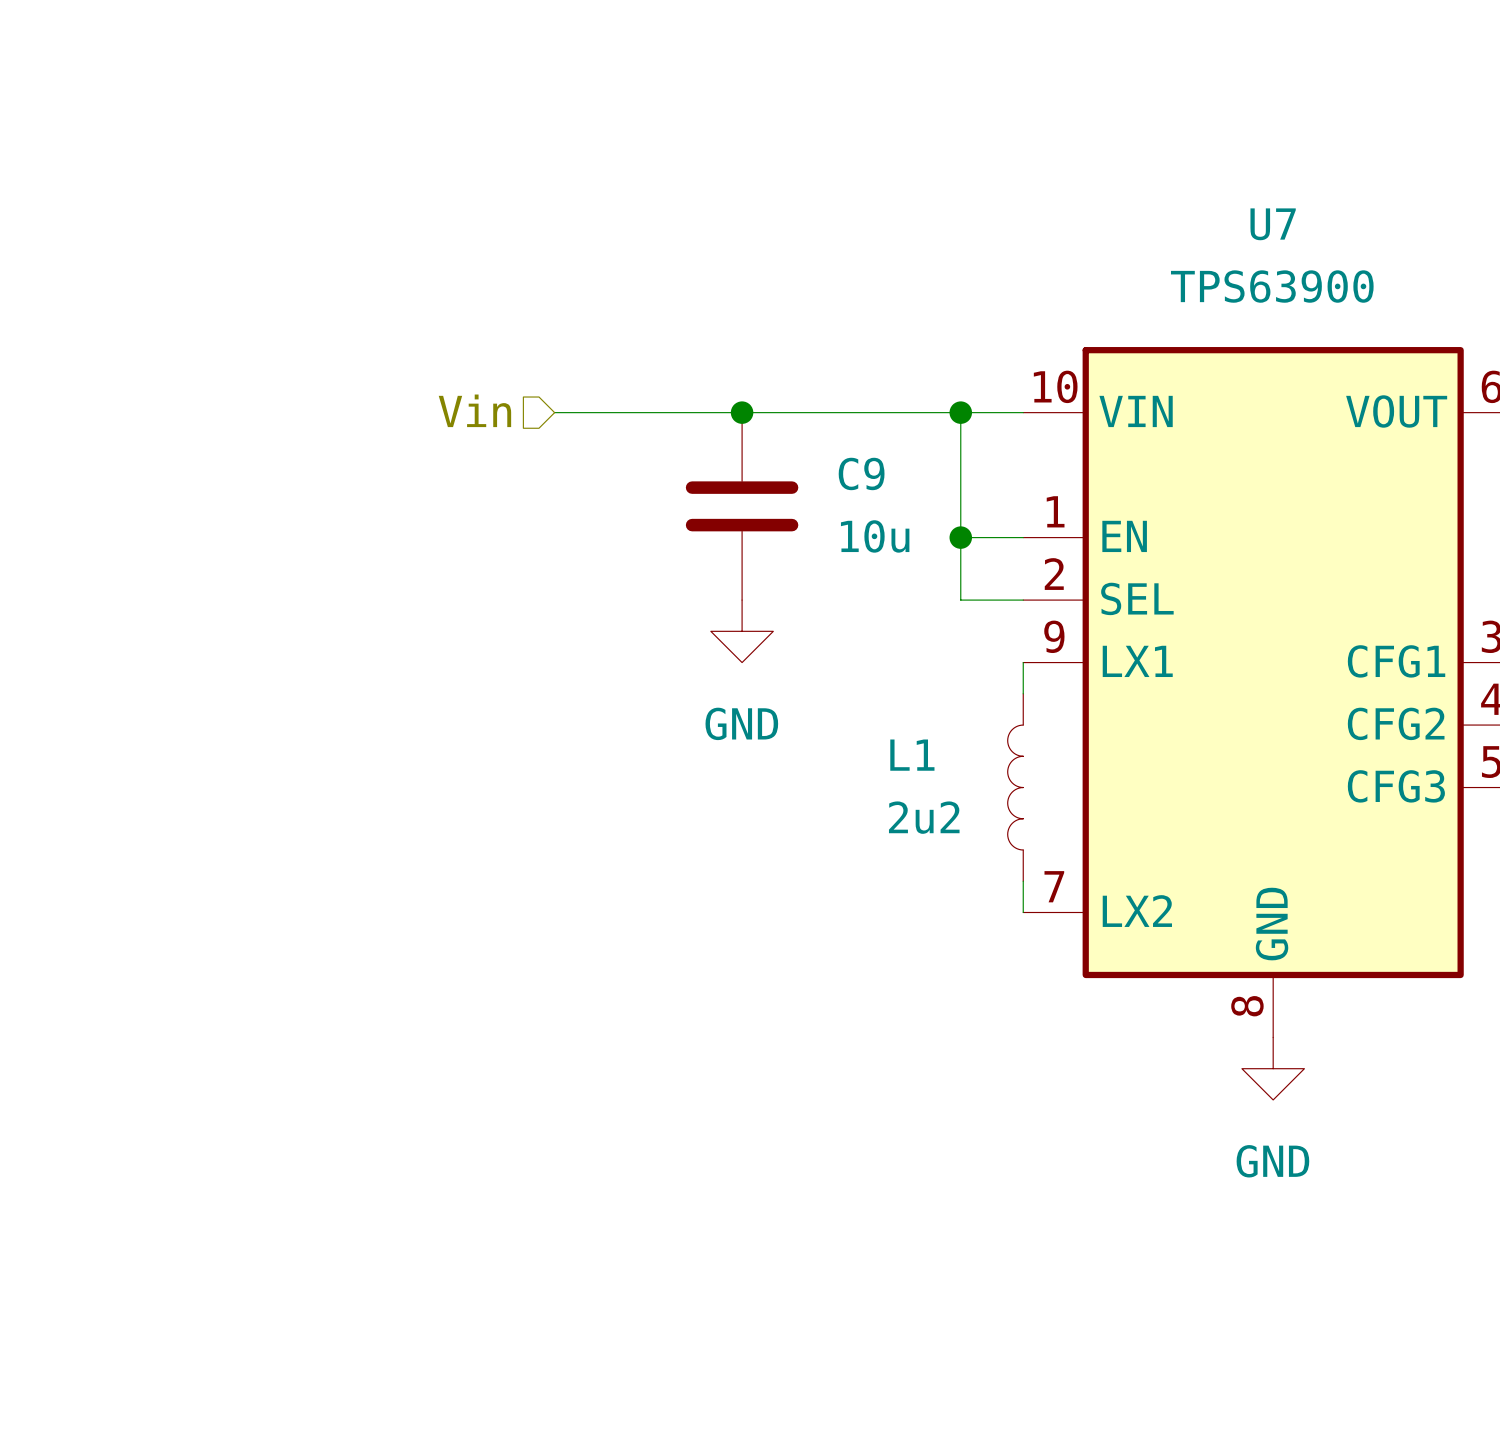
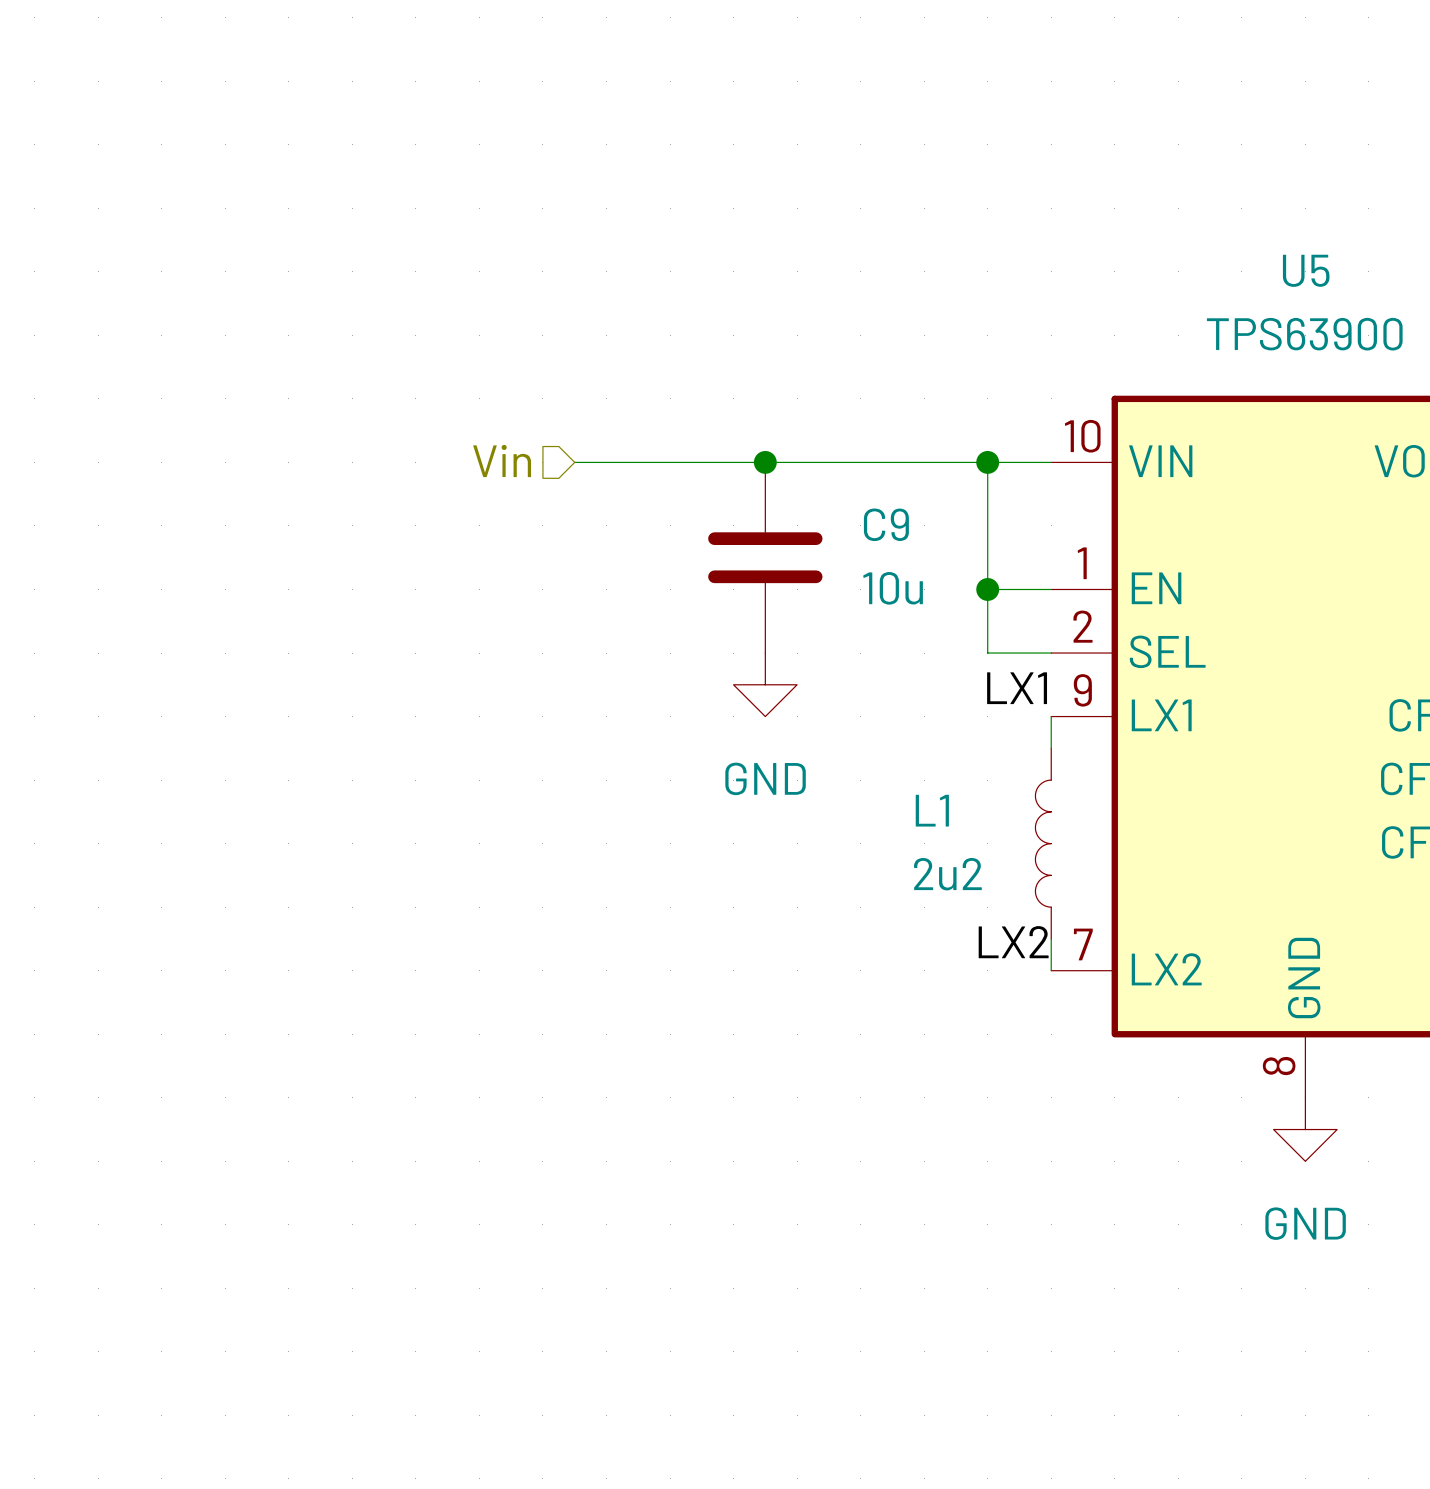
U7 name: U7 (1273, 224) -> U5 (1306, 270)
label: none -> LX1 (1017, 688)
label: none -> LX2 (1013, 942)

